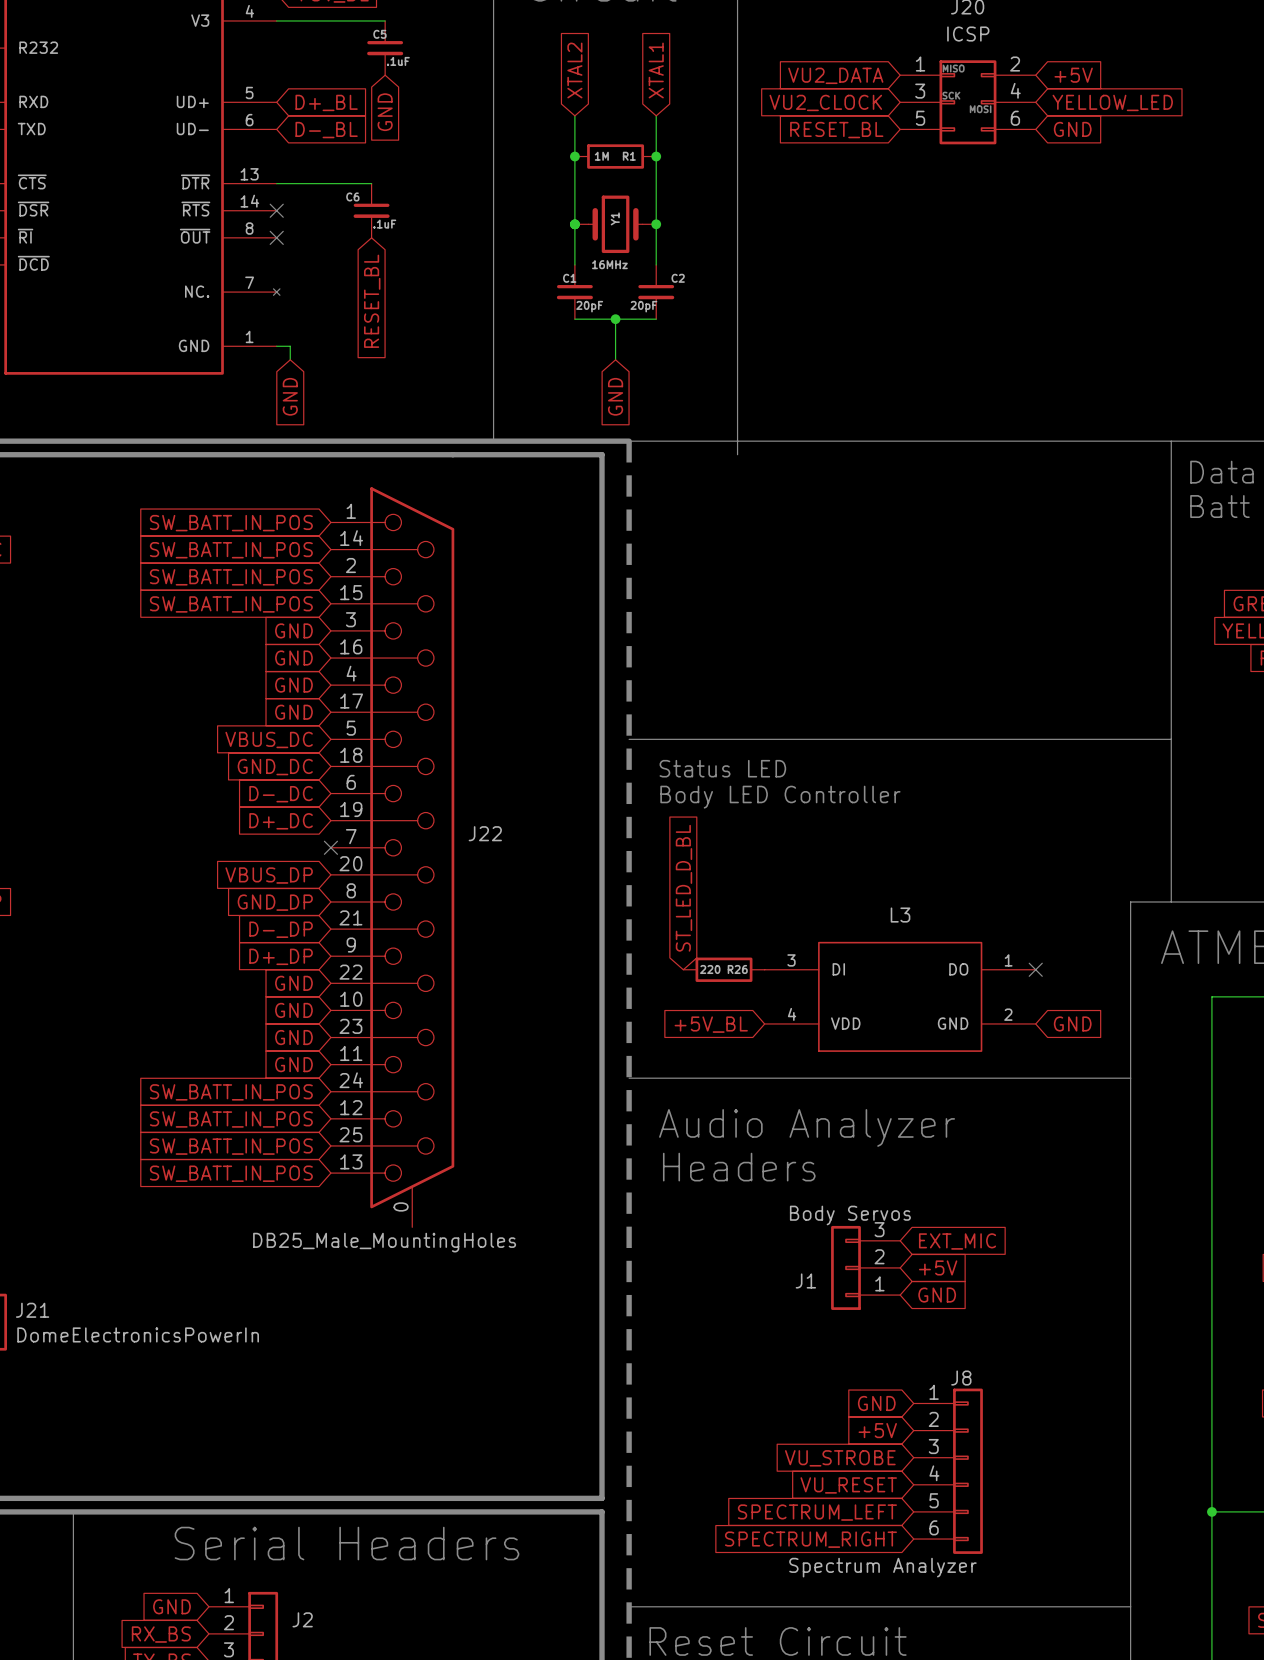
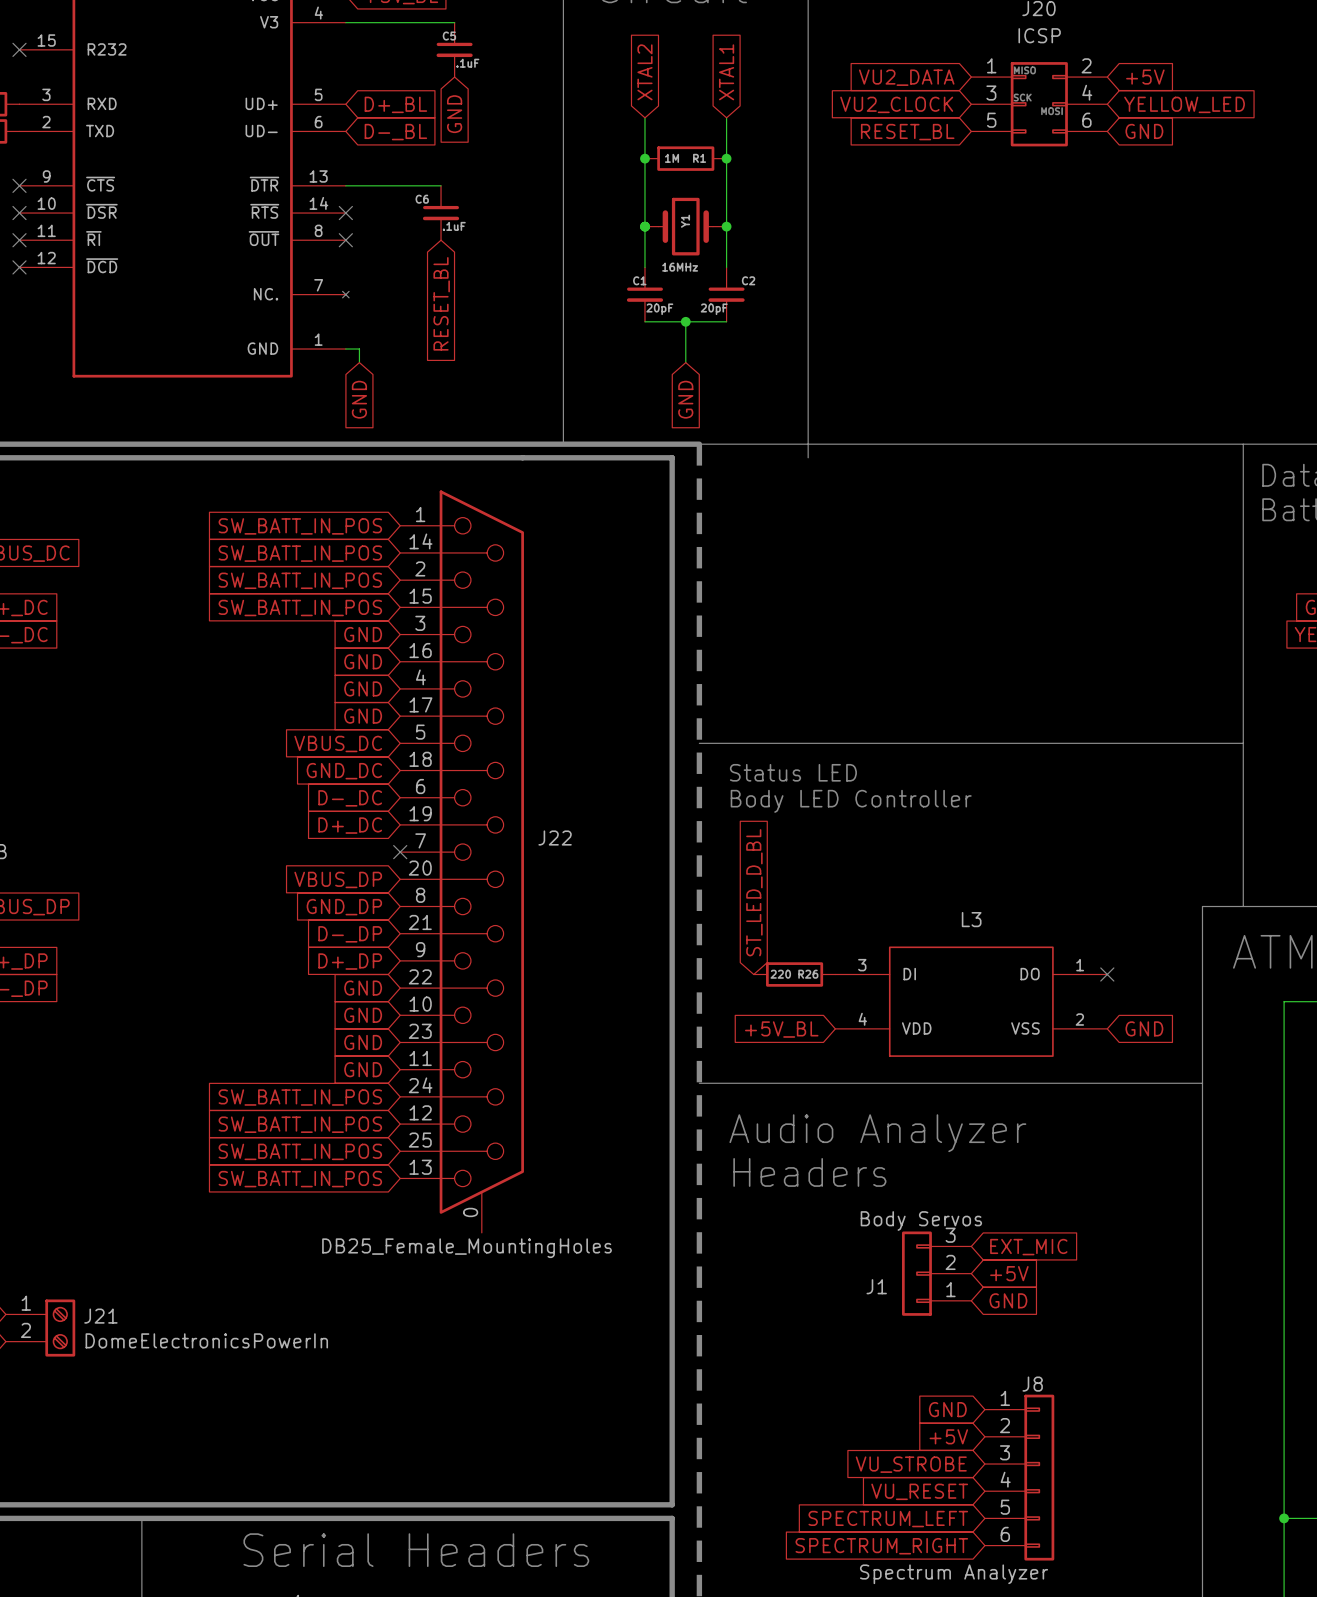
L3 pin name: GND (953, 1023) -> VSS (1025, 1028)
J22 value: DB25_Male_MountingHoles (384, 1242) -> DB25_Female_MountingHoles (467, 1248)

